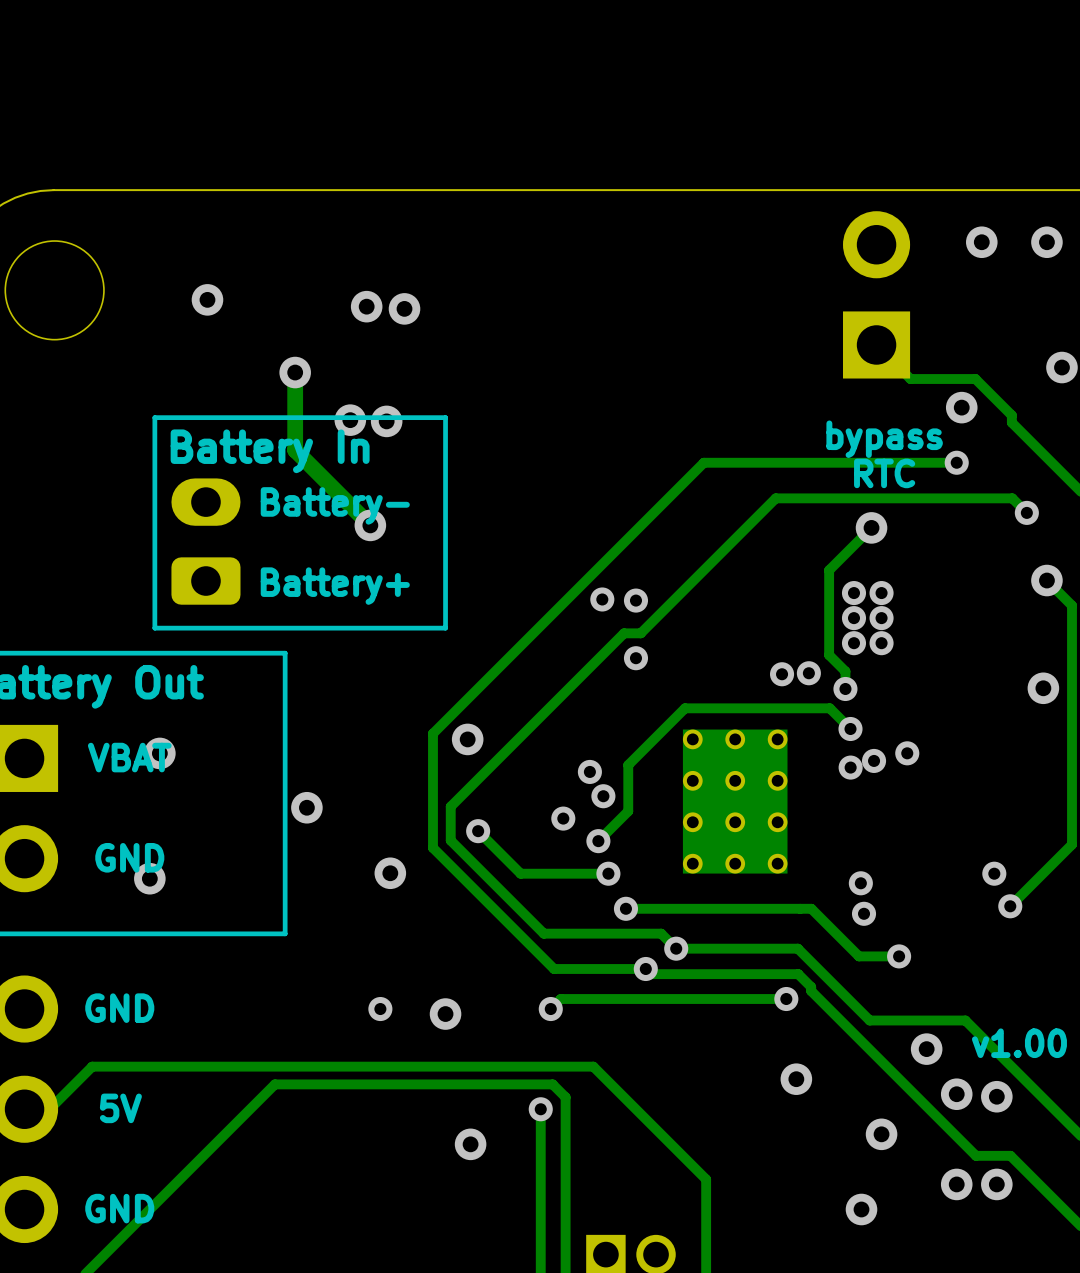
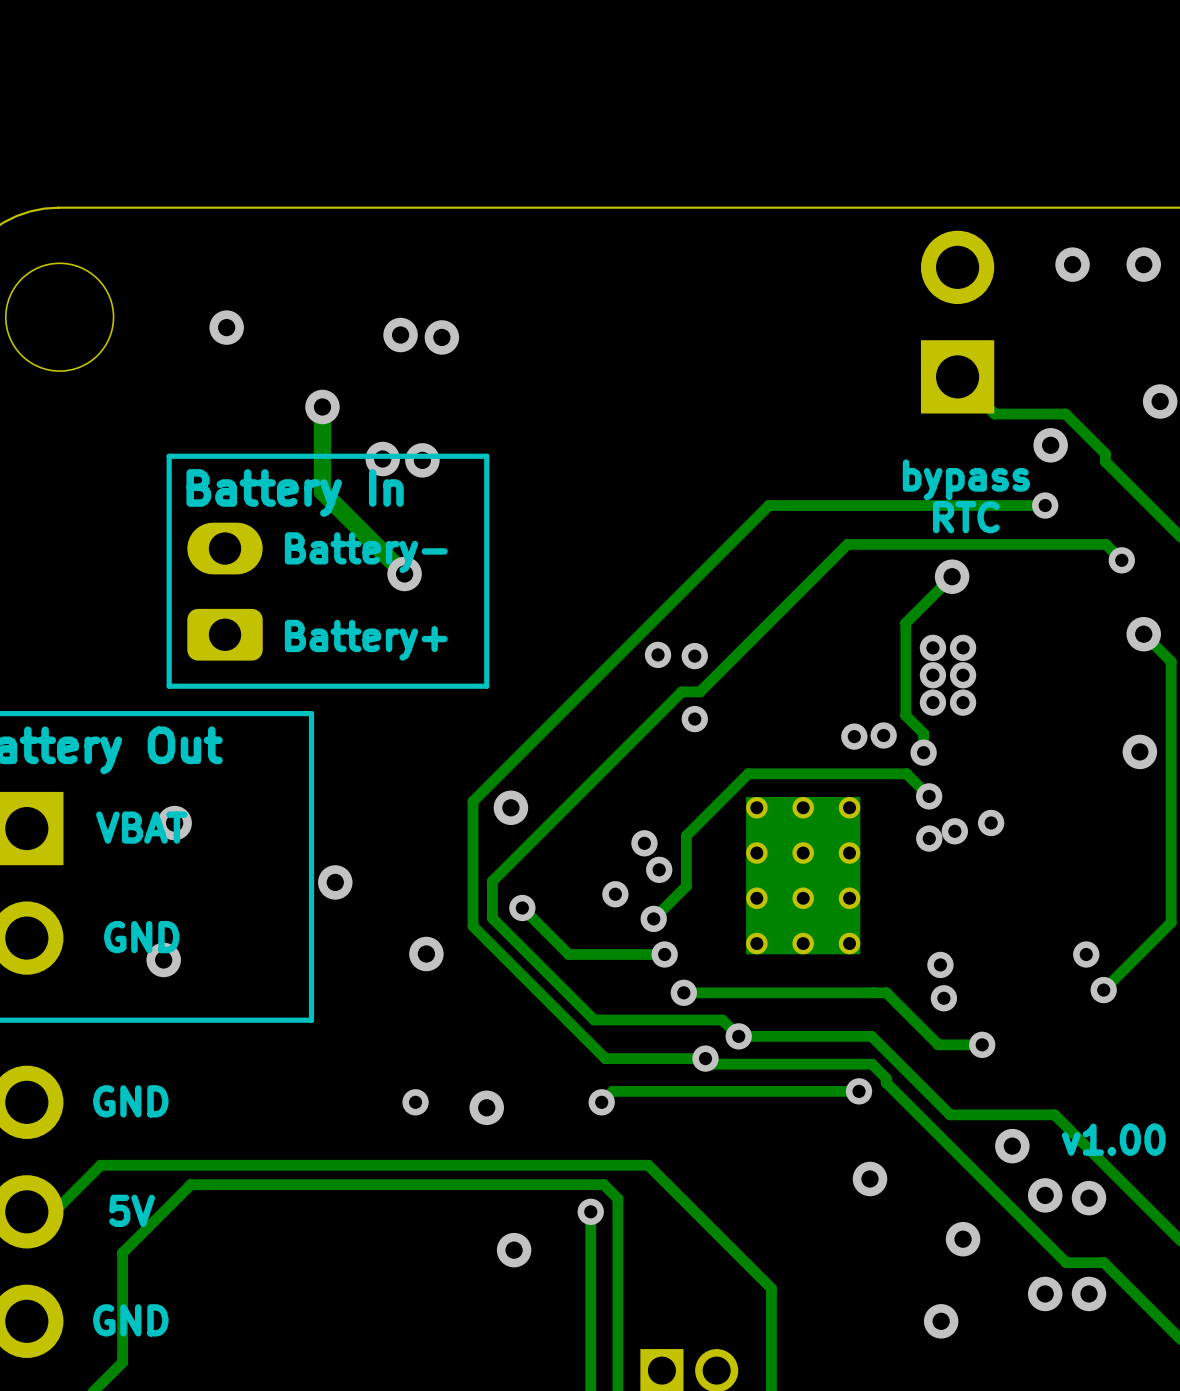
track: (274, 1084) (112, 1247) -> (300, 1184) (190, 1184) (122, 1252) (122, 1362)

